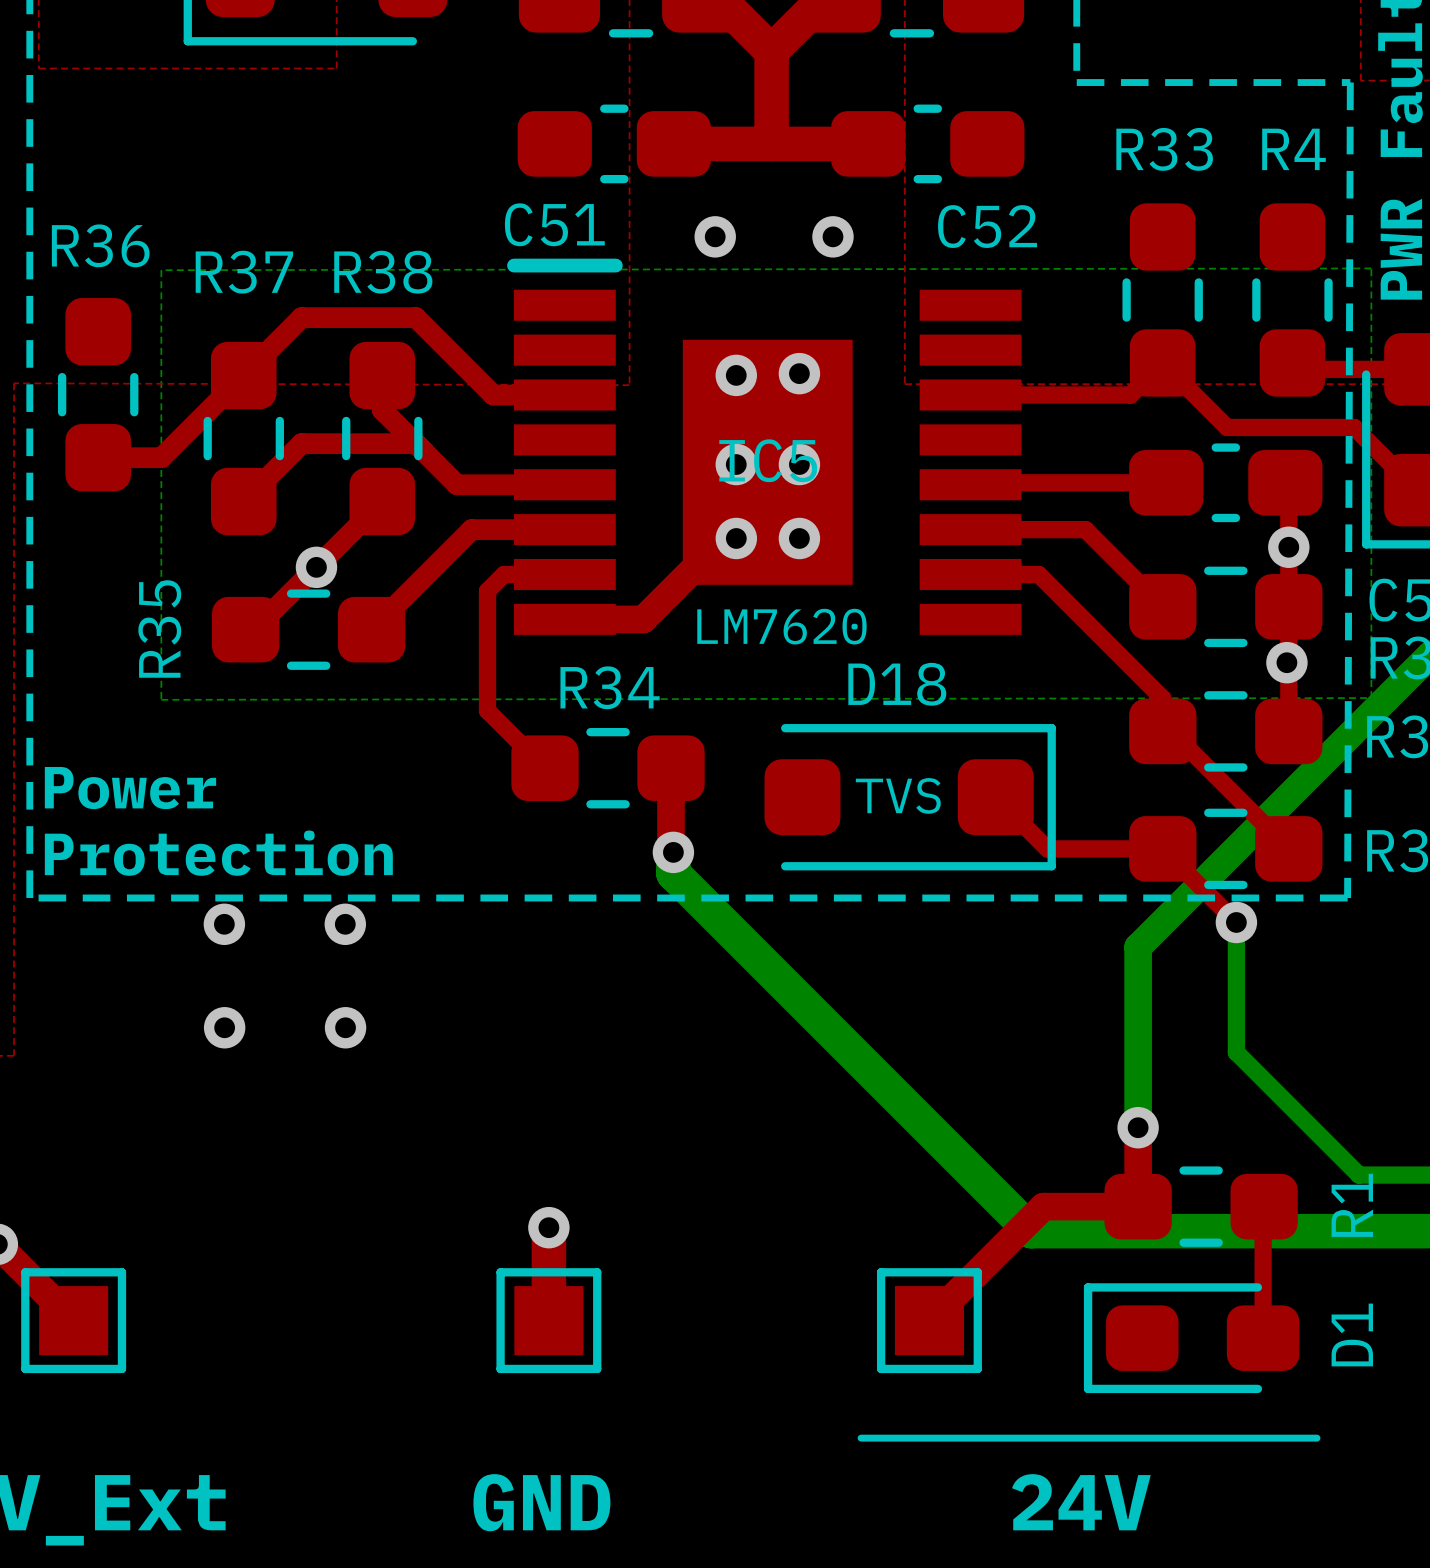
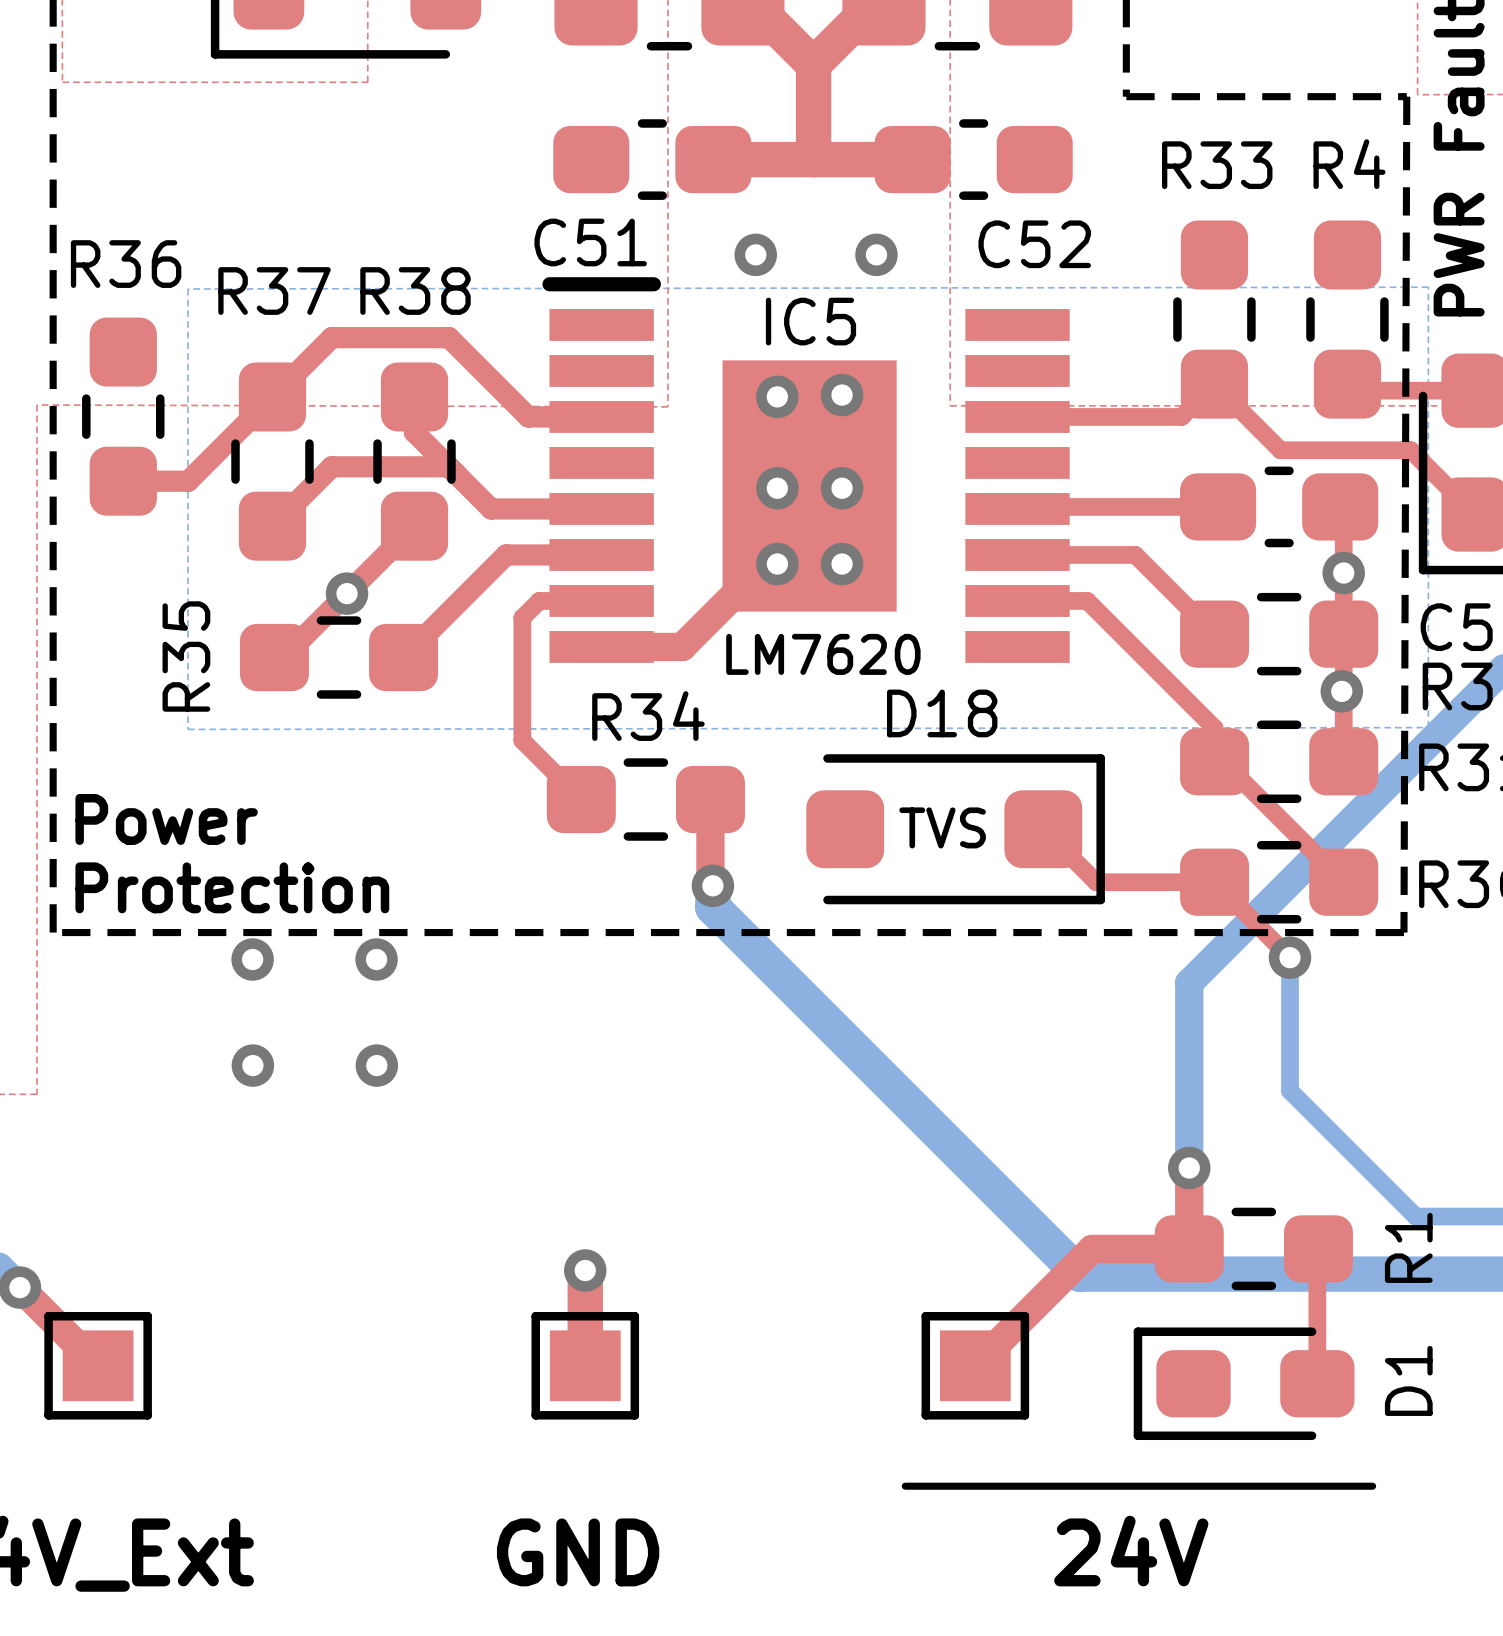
IC5 name position: IC5 (768, 460) -> IC5 (810, 321)

